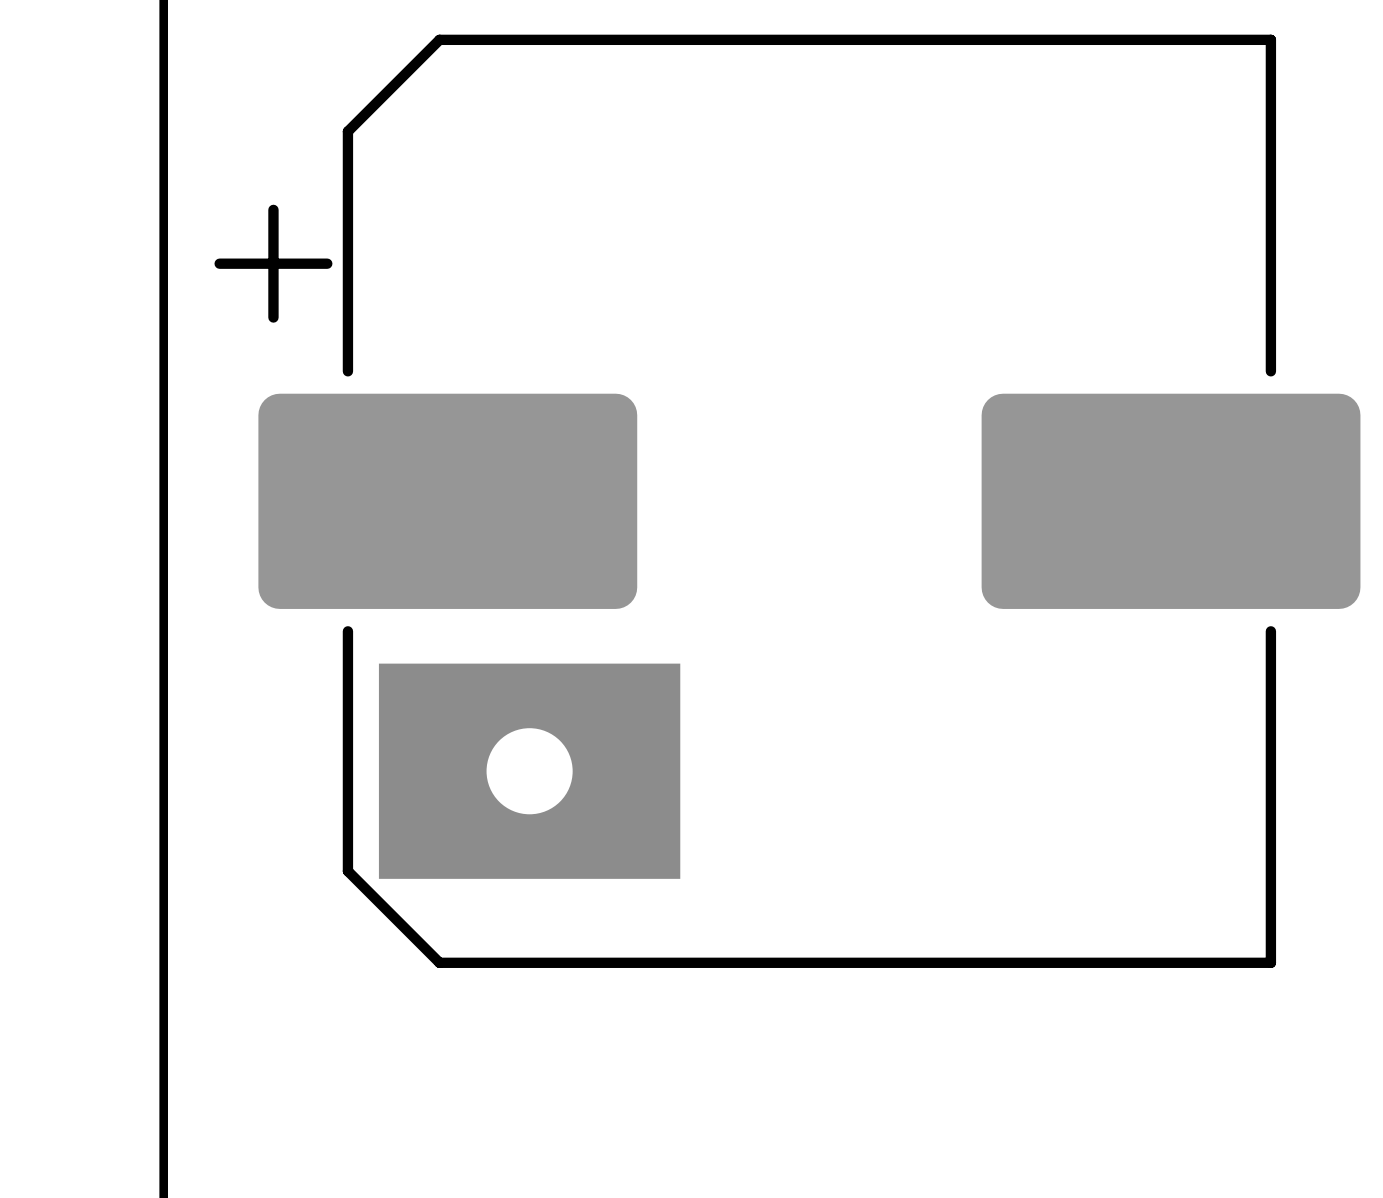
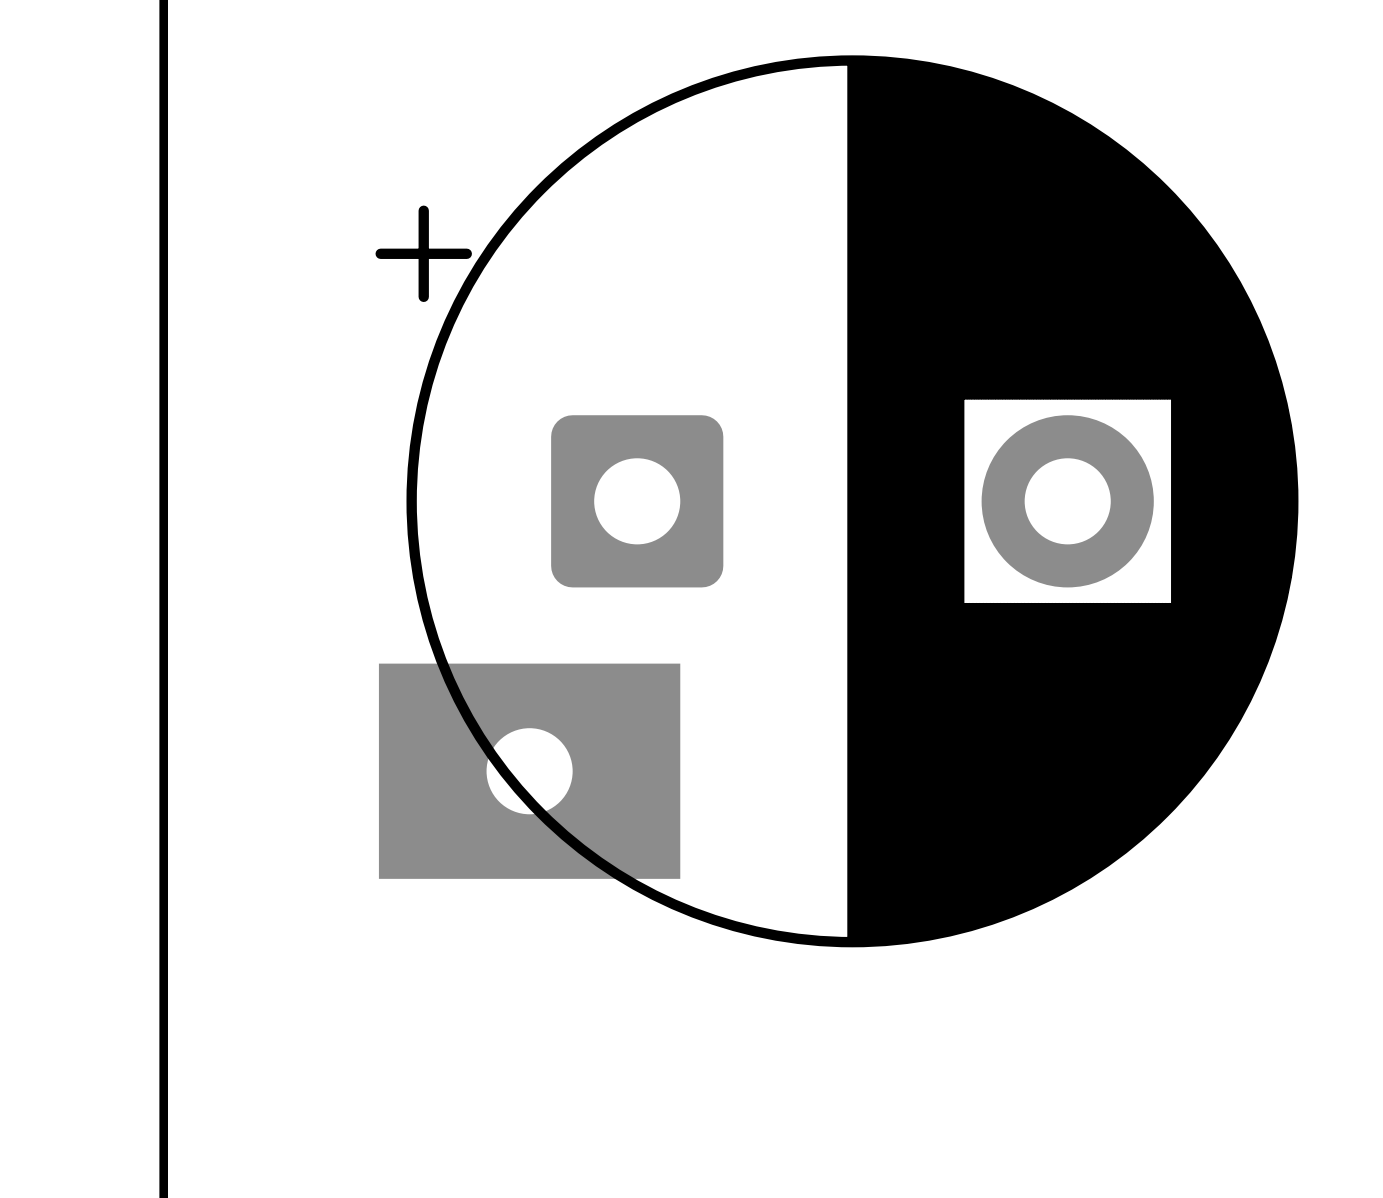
part footprint: [214, 34, 1361, 968] -> [375, 55, 1299, 948]

